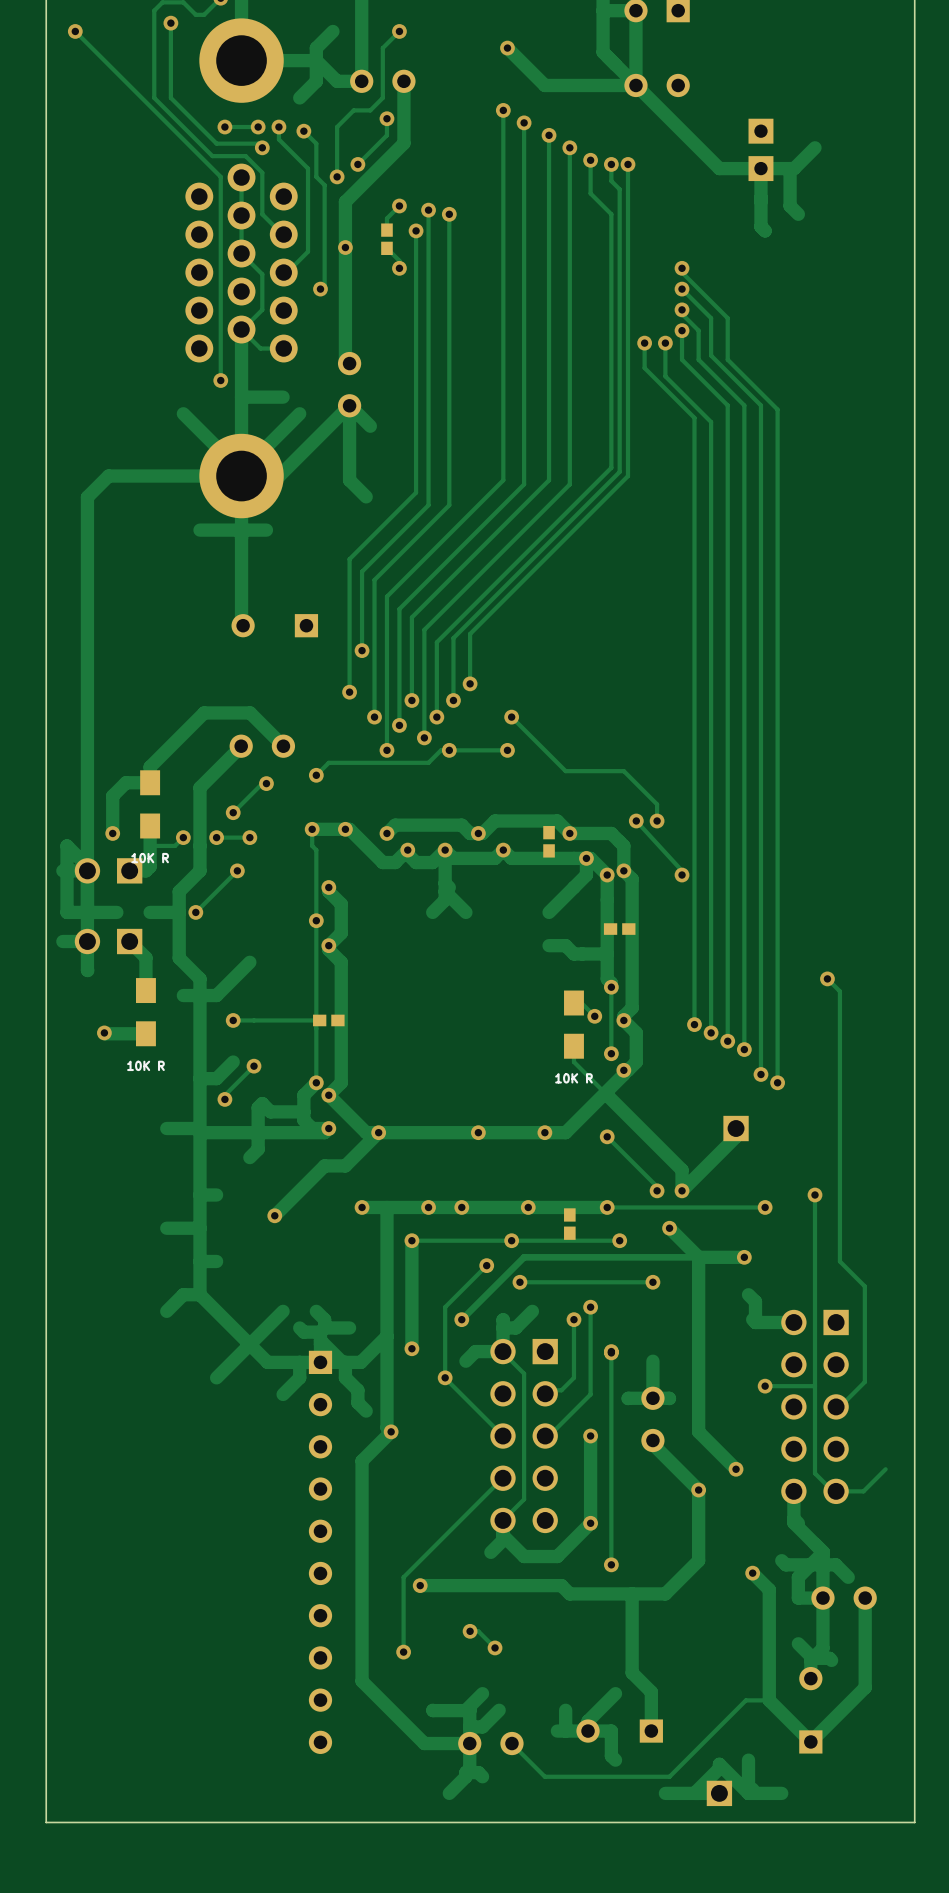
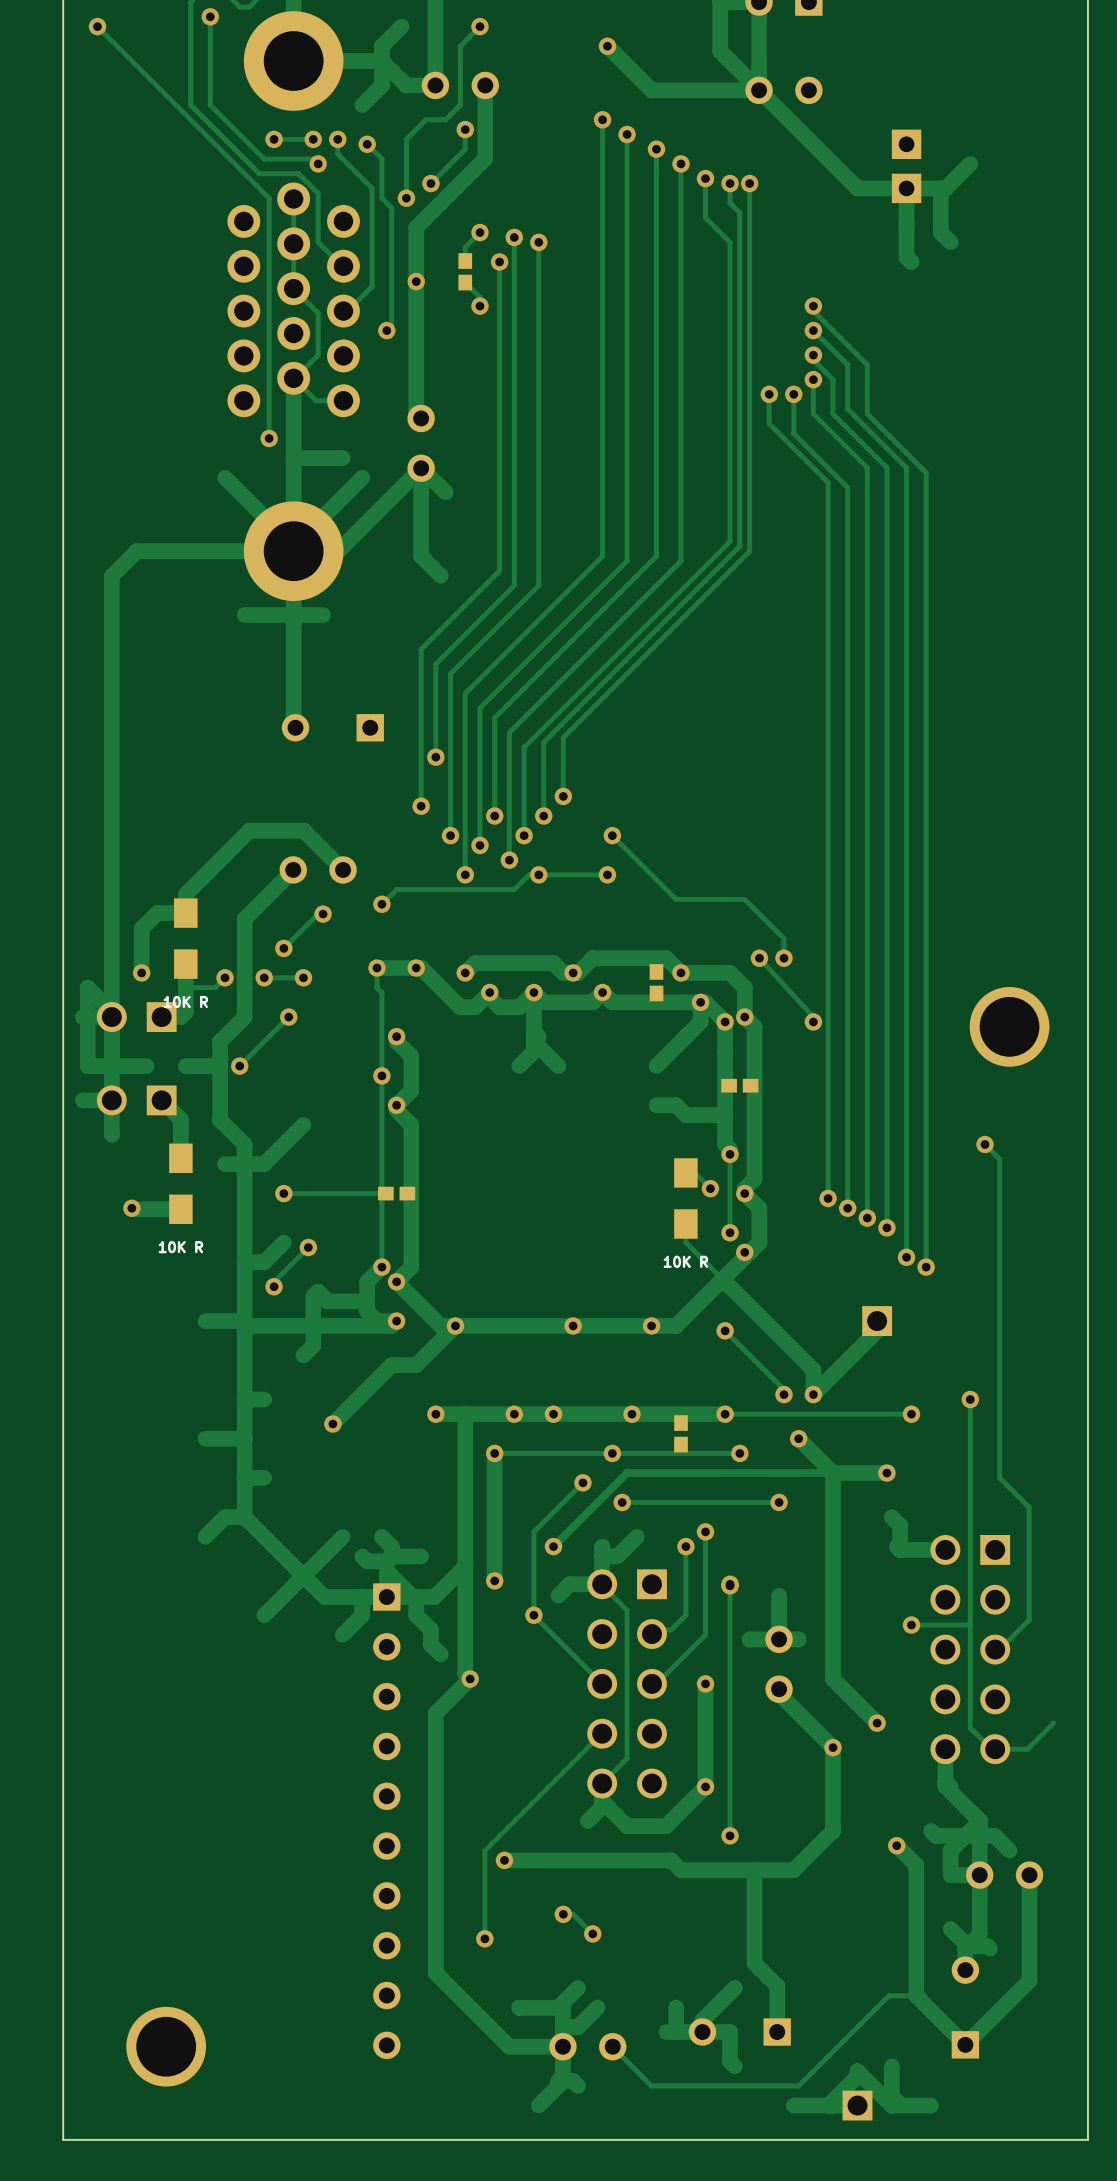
part: none -> (1009, 1026)
part: none -> (166, 2046)

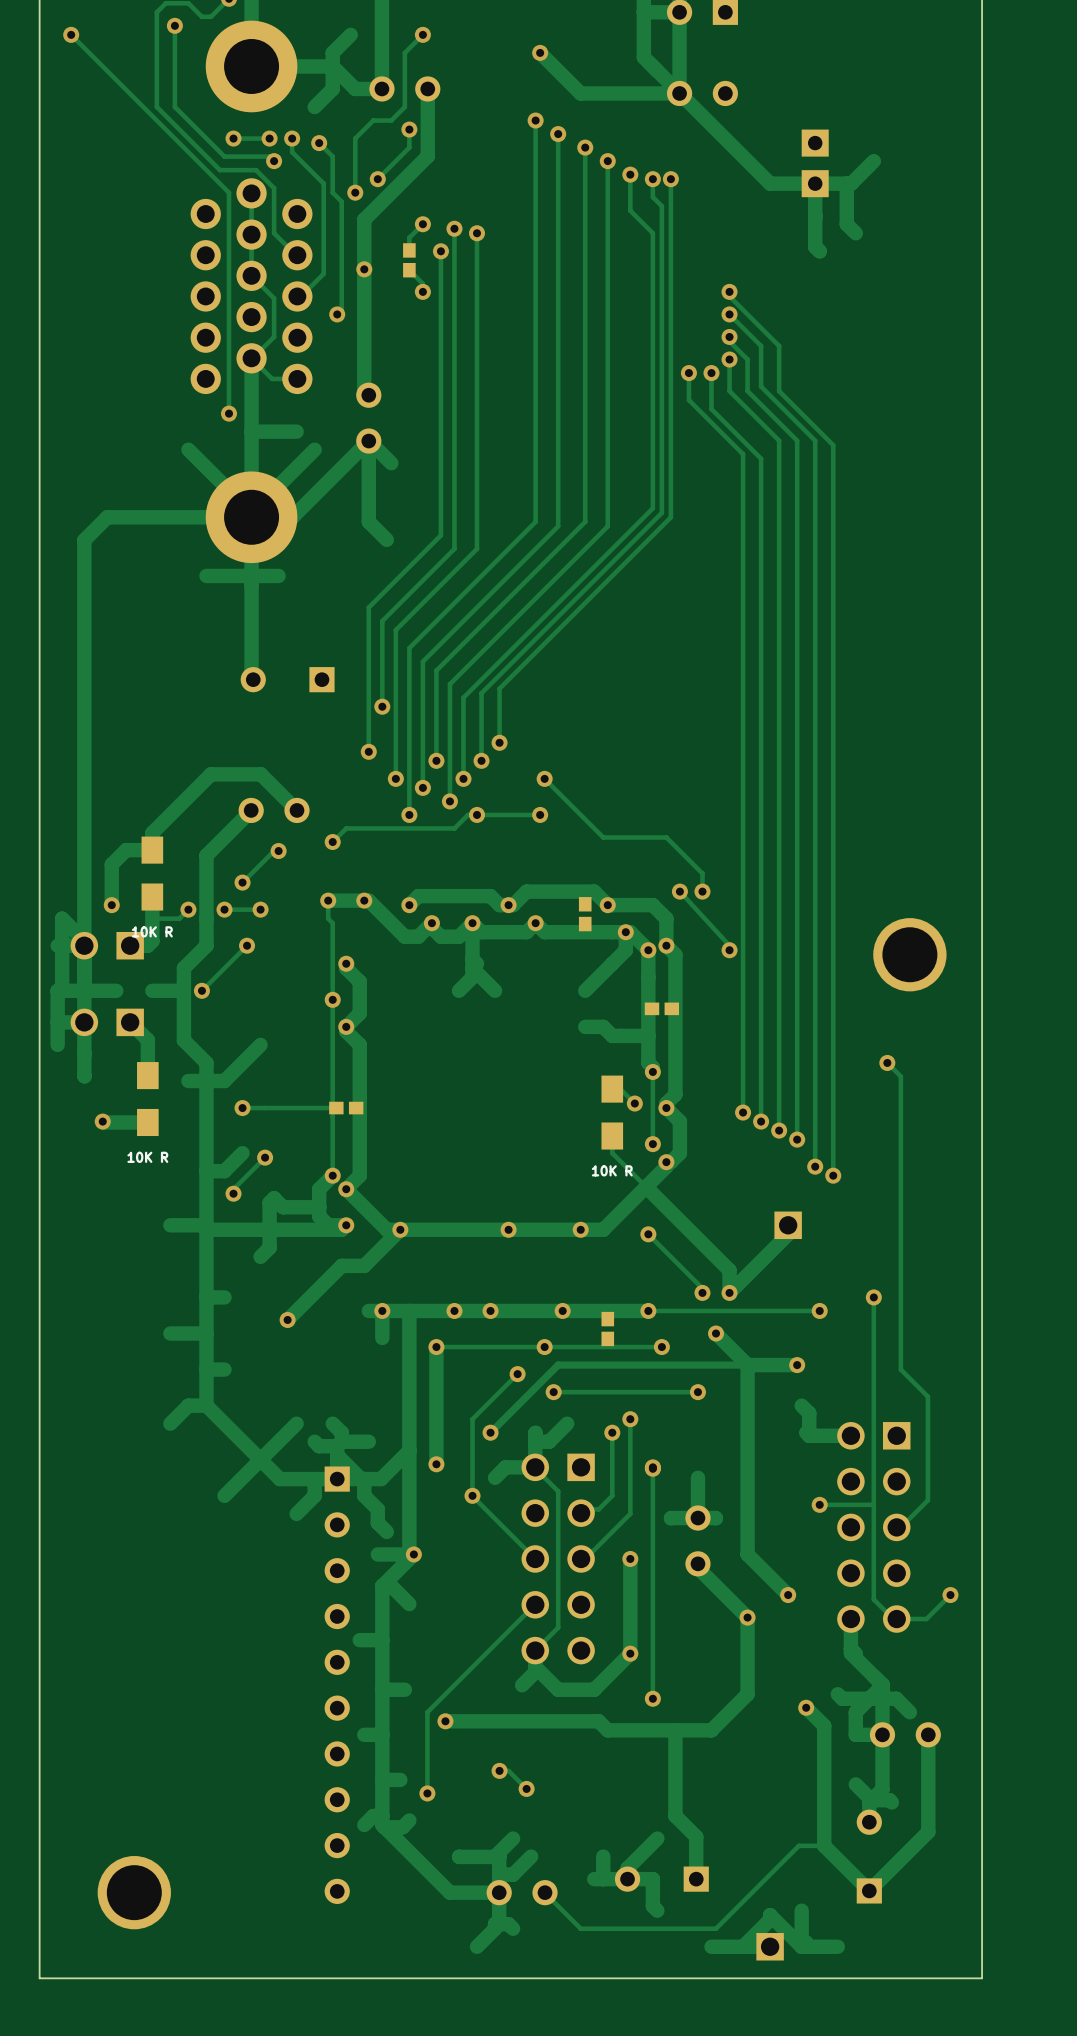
track: none -> (62, 990) (57, 990) (57, 1044)
track: none -> (84, 1053) (84, 1076)
track: none -> (368, 1310) (382, 1310) (382, 1338)
track: none -> (413, 1554) (377, 1554)
track: none -> (382, 1586) (391, 1586) (409, 1604)
via: none -> (950, 1595)
track: none -> (382, 1640) (359, 1640)
track: none -> (404, 1689) (382, 1689)
track: none -> (382, 1734) (364, 1734)
track: none -> (400, 1779) (382, 1779)
track: none -> (382, 1816) (373, 1816) (364, 1825)
track: none -> (409, 1820) (402, 1827) (384, 1827)

